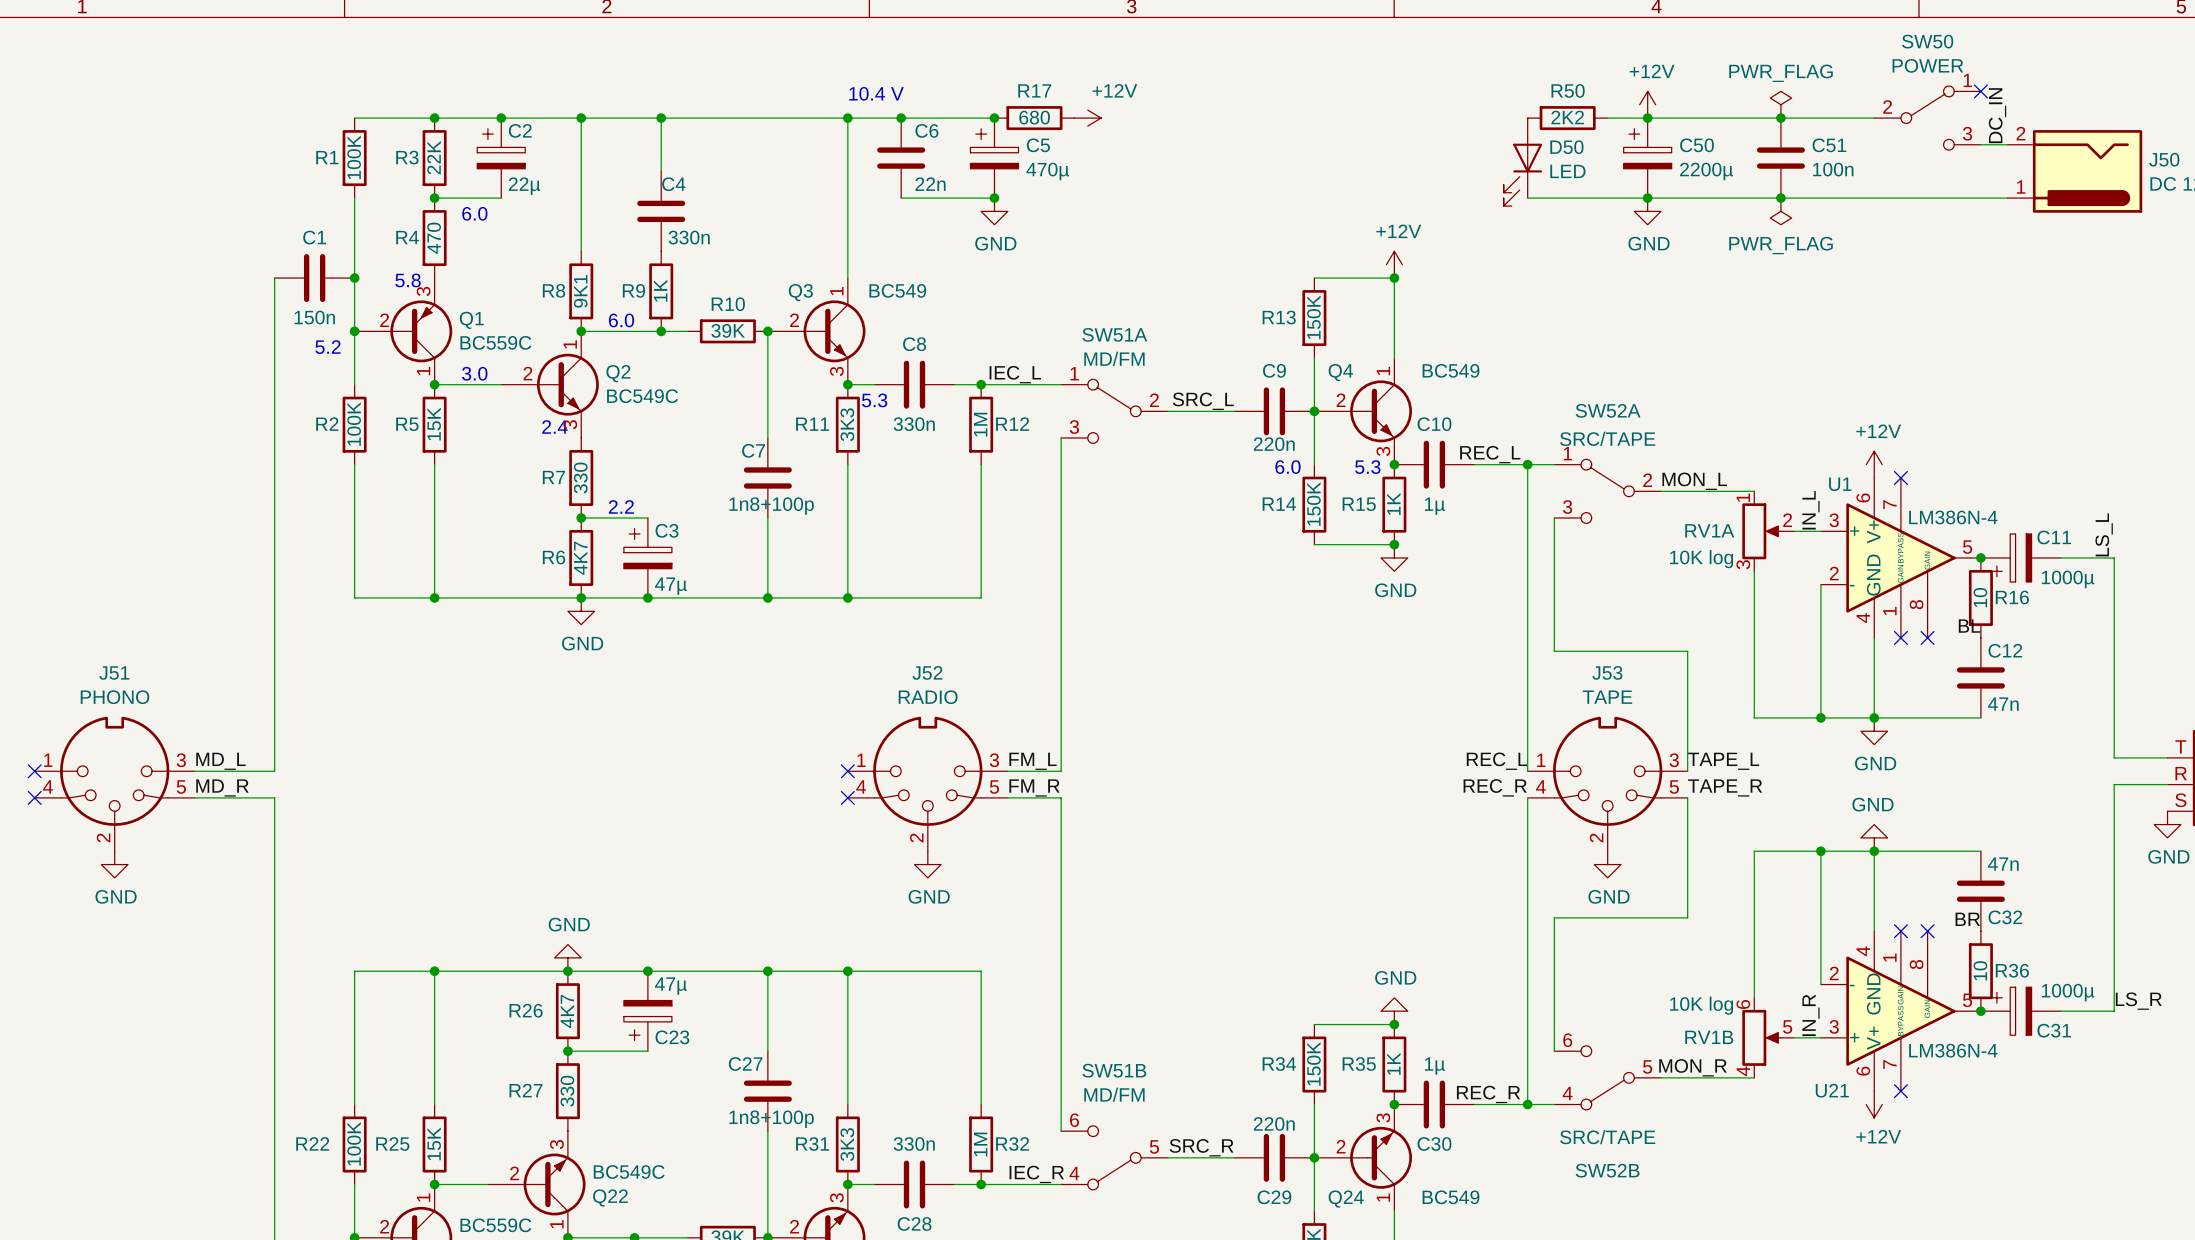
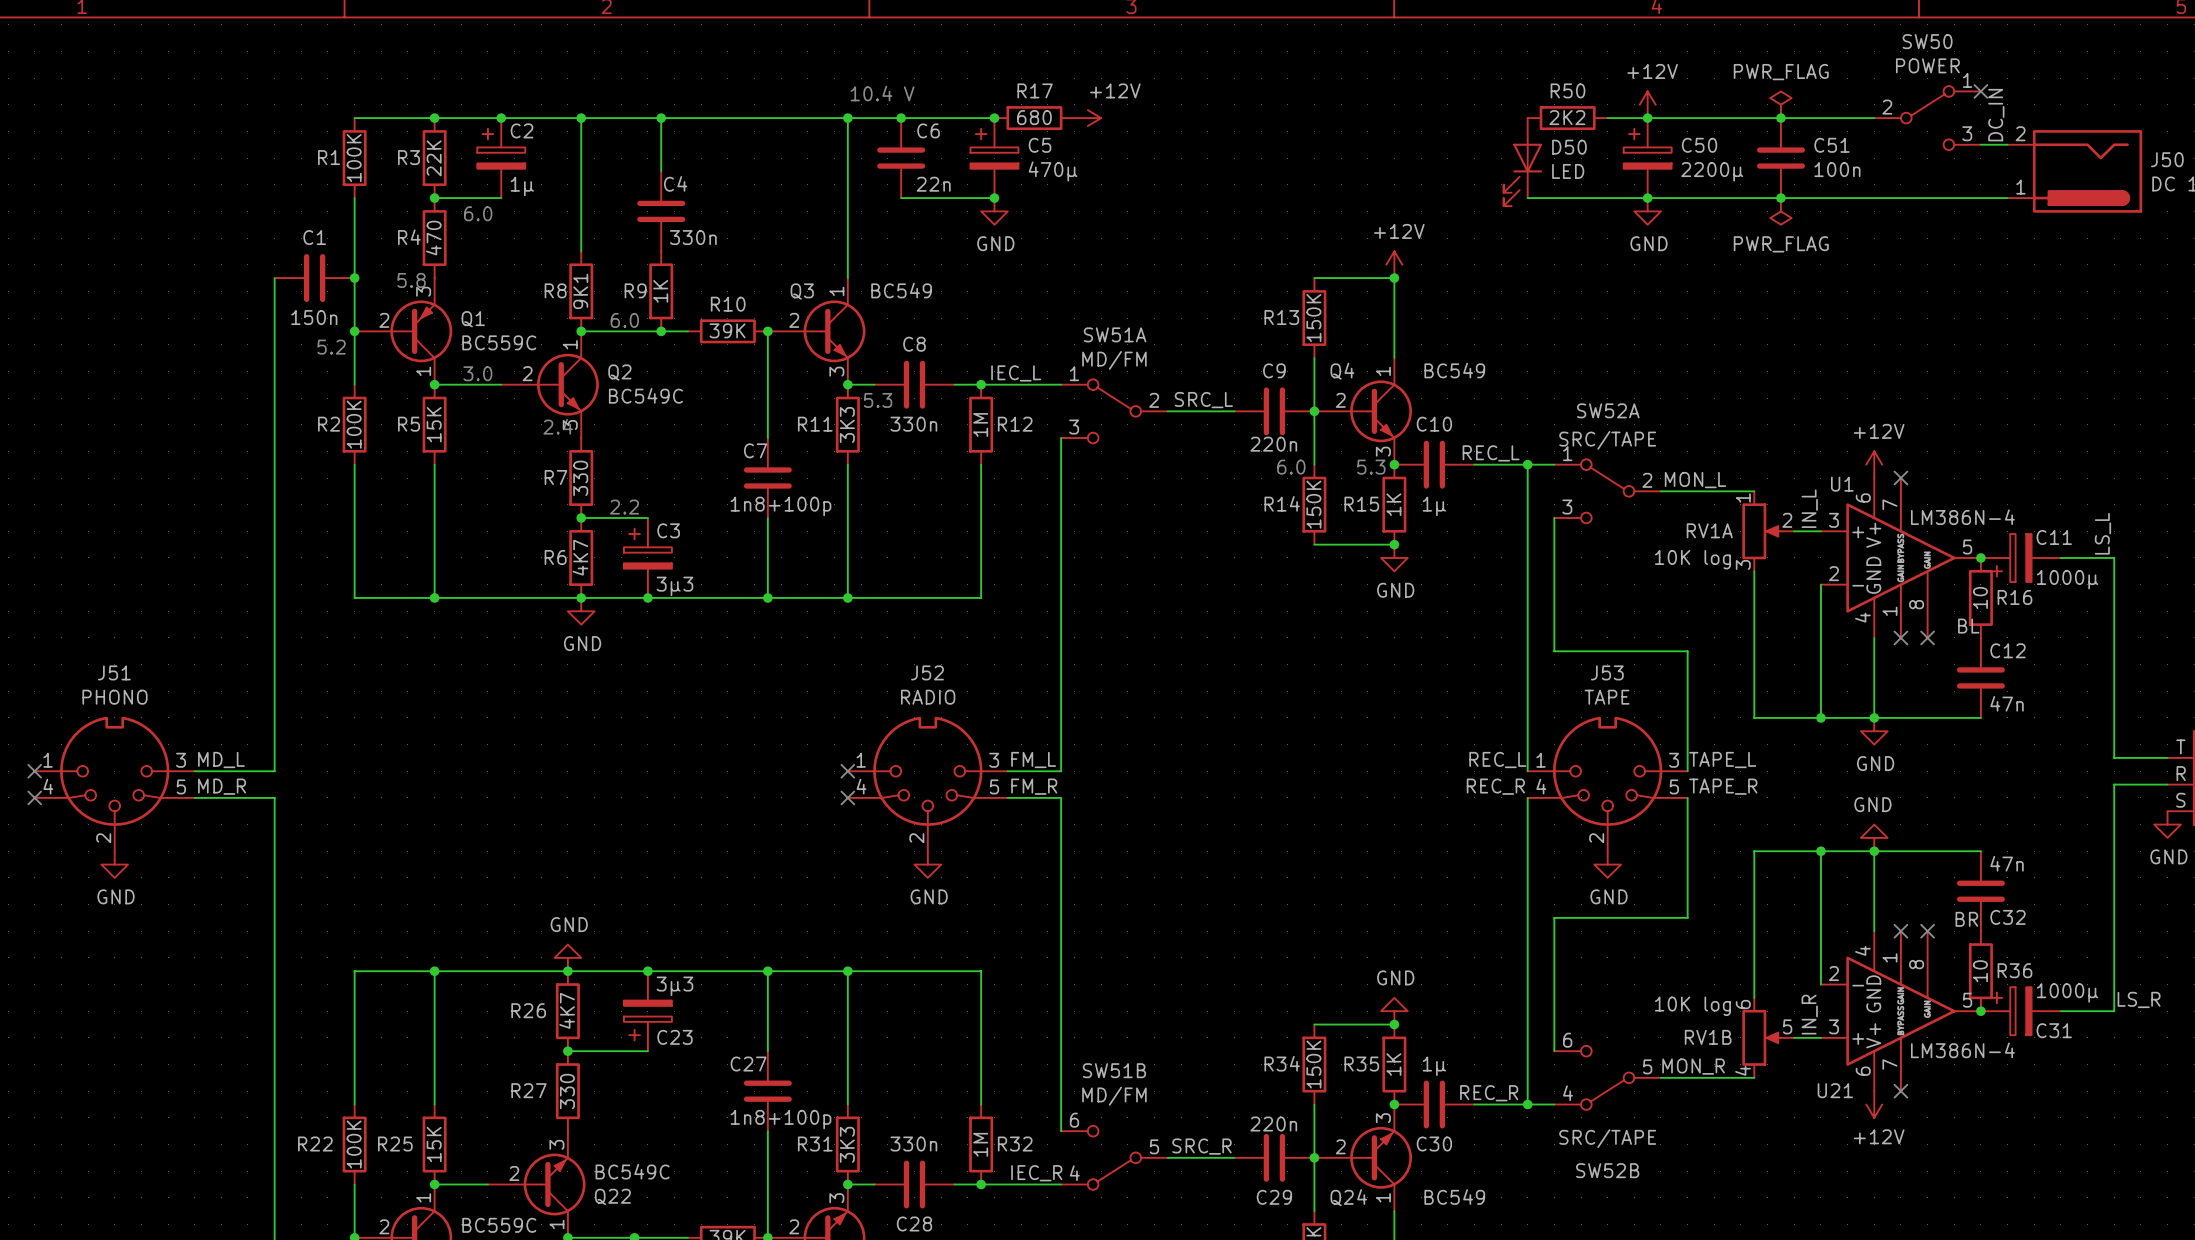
C2 value: 22µ (524, 186) -> 1µ (522, 186)
C3 value: 47µ (670, 586) -> 3µ3 (674, 586)
C23 value: 47µ (670, 986) -> 3µ3 (674, 986)

